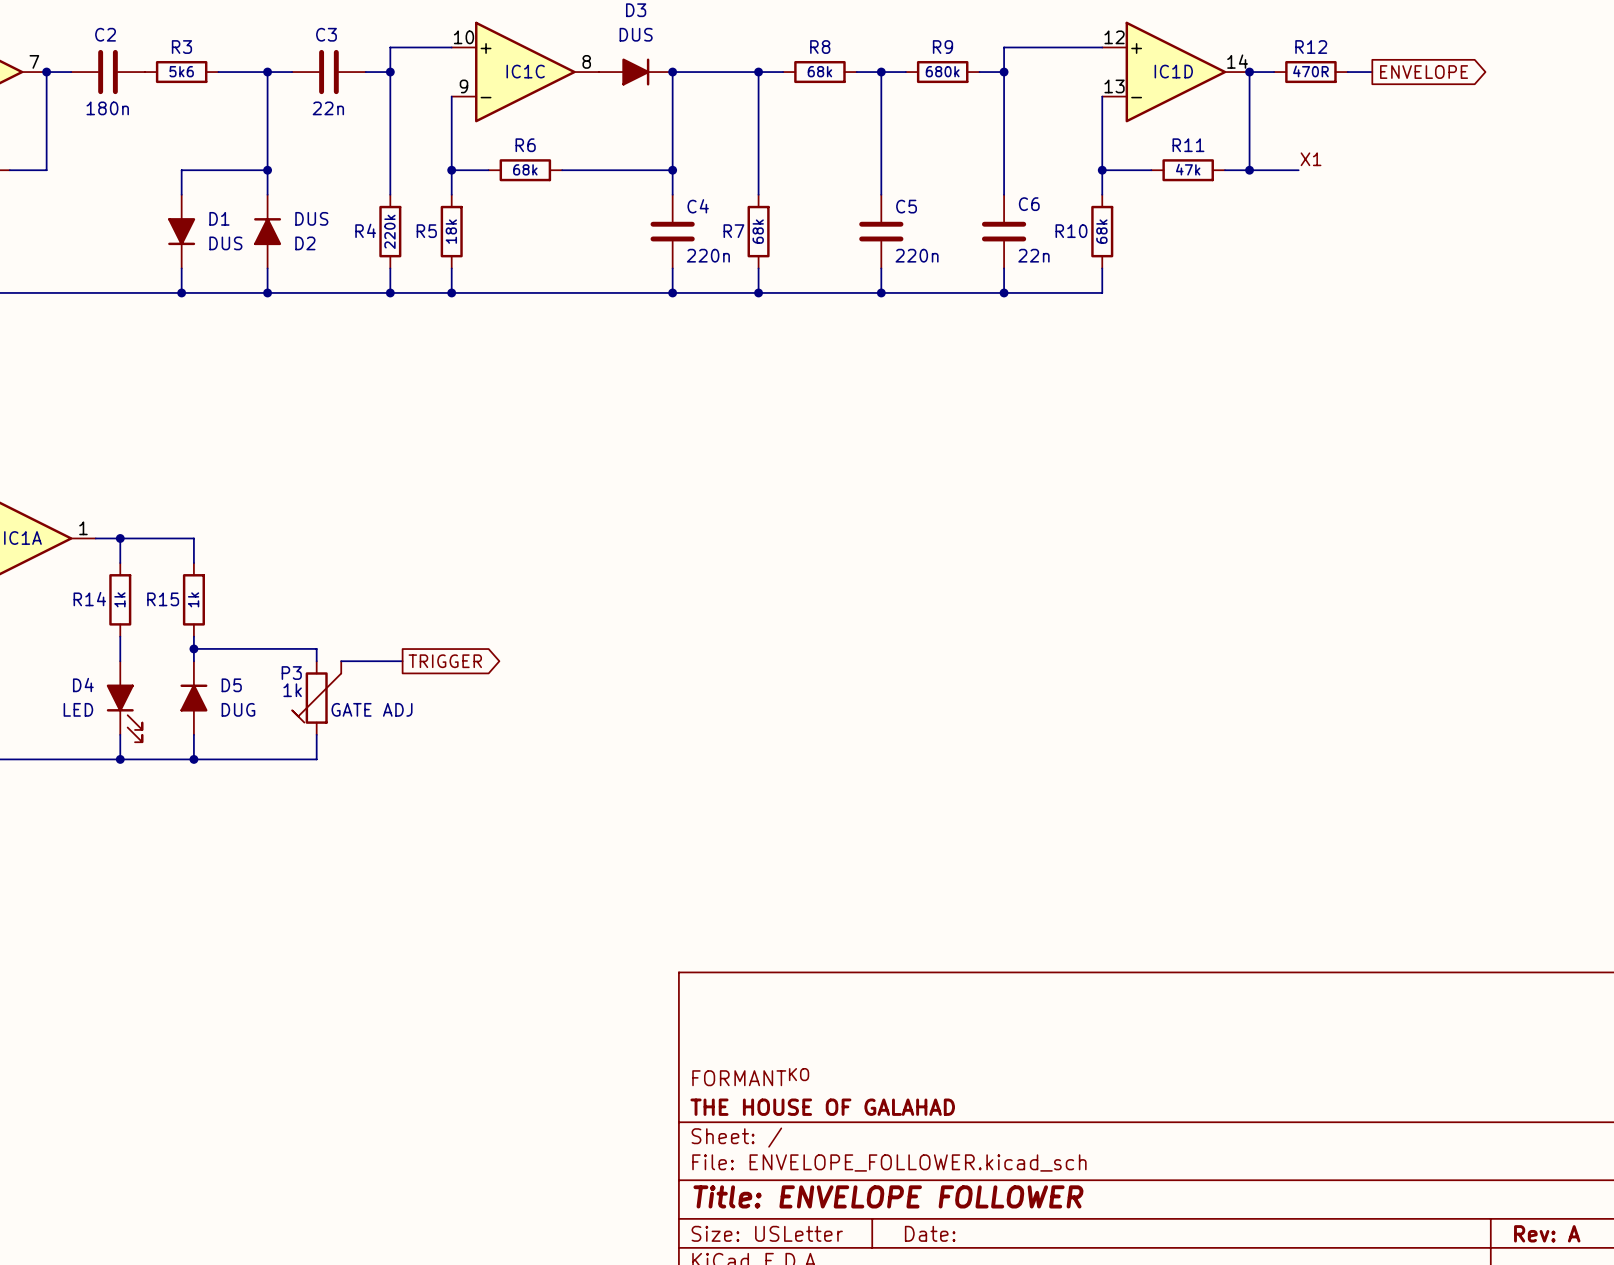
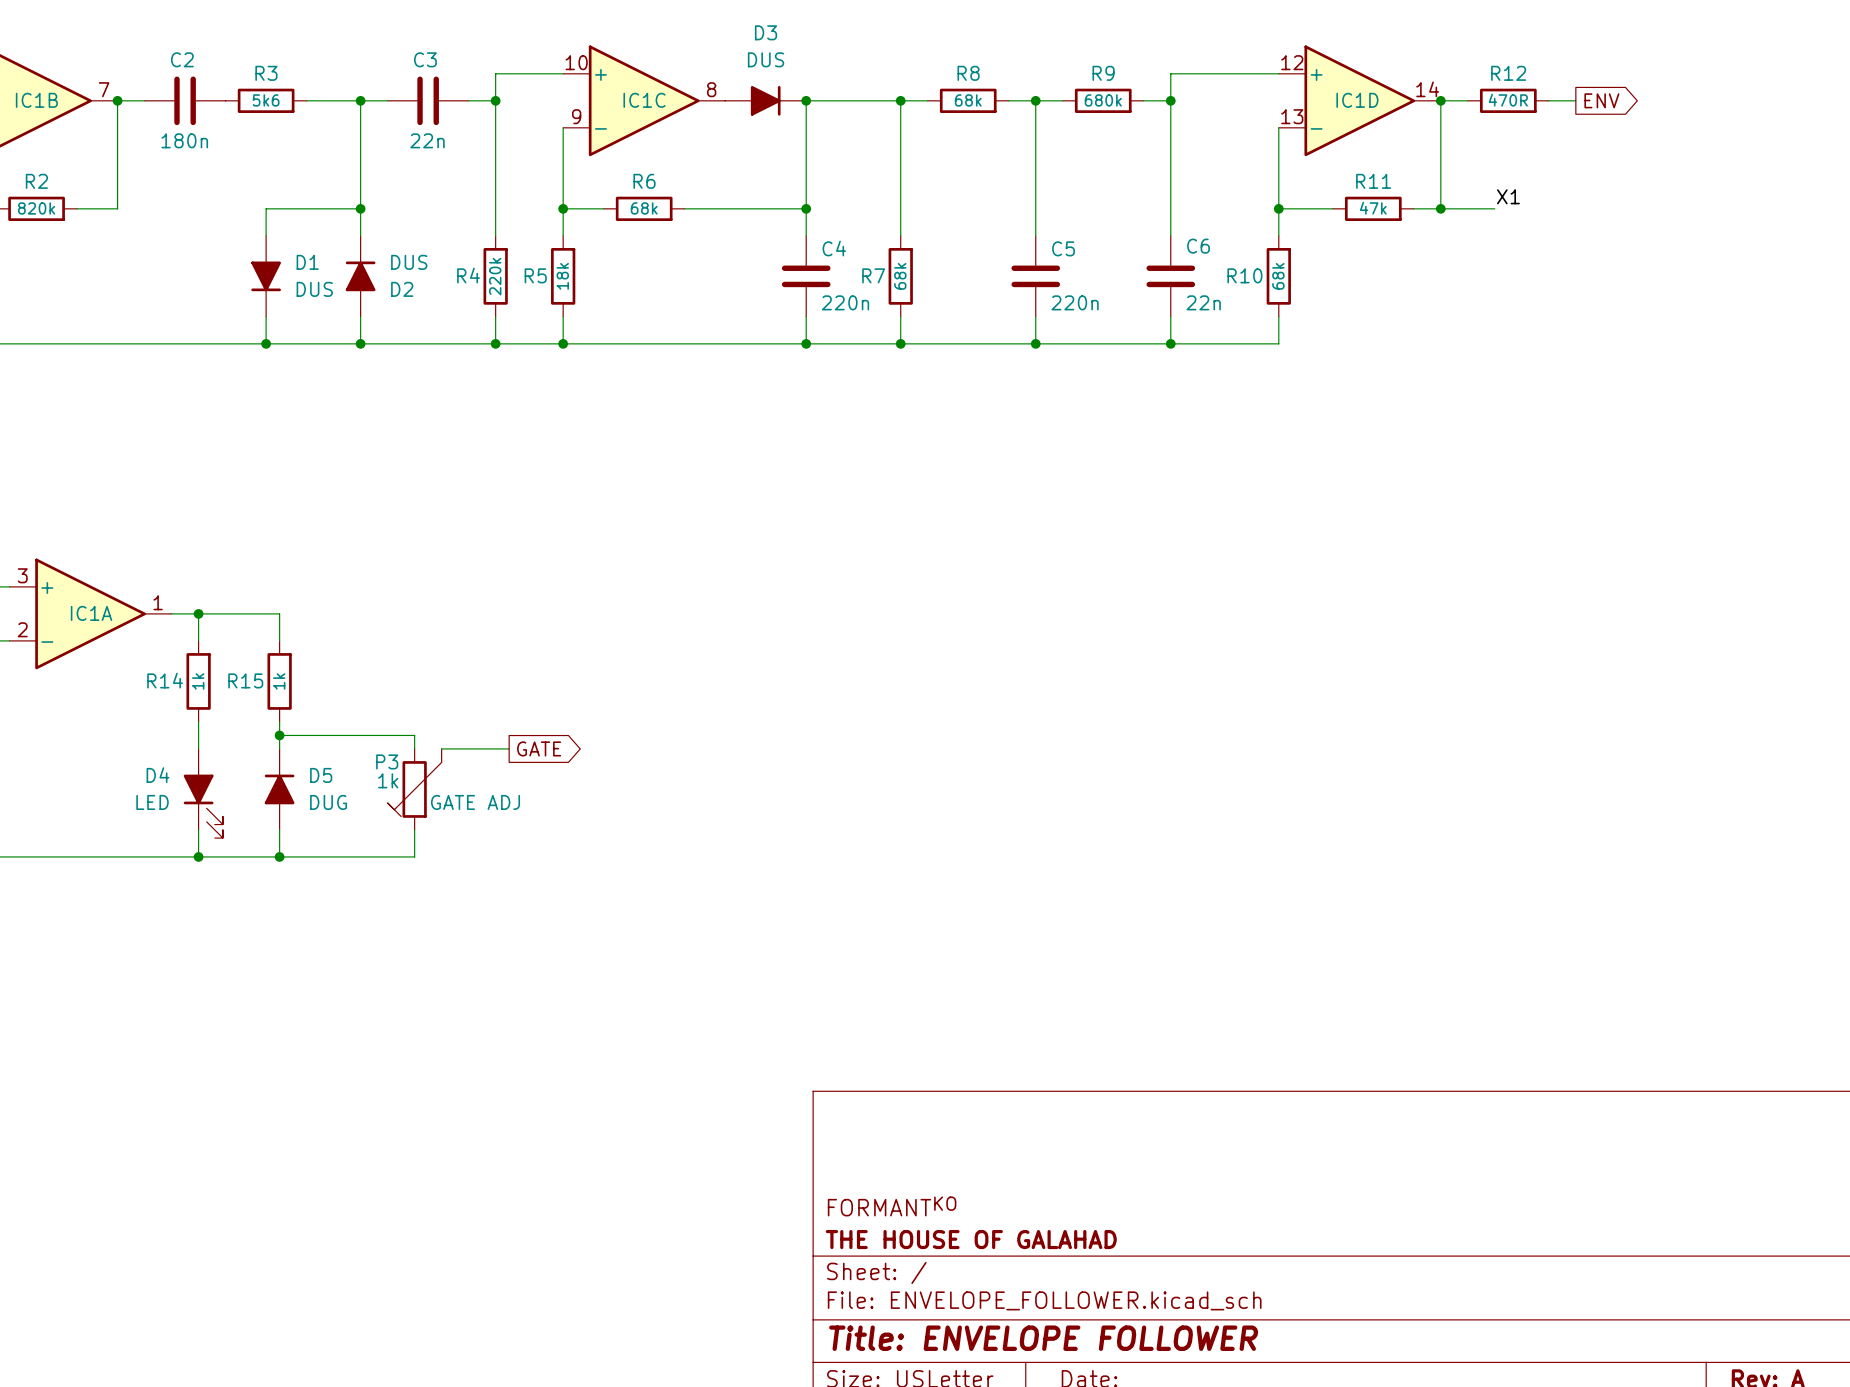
global label: ENVELOPE (1424, 72) -> ENV (1601, 100)
global label: TRIGGER (445, 661) -> GATE (539, 748)

